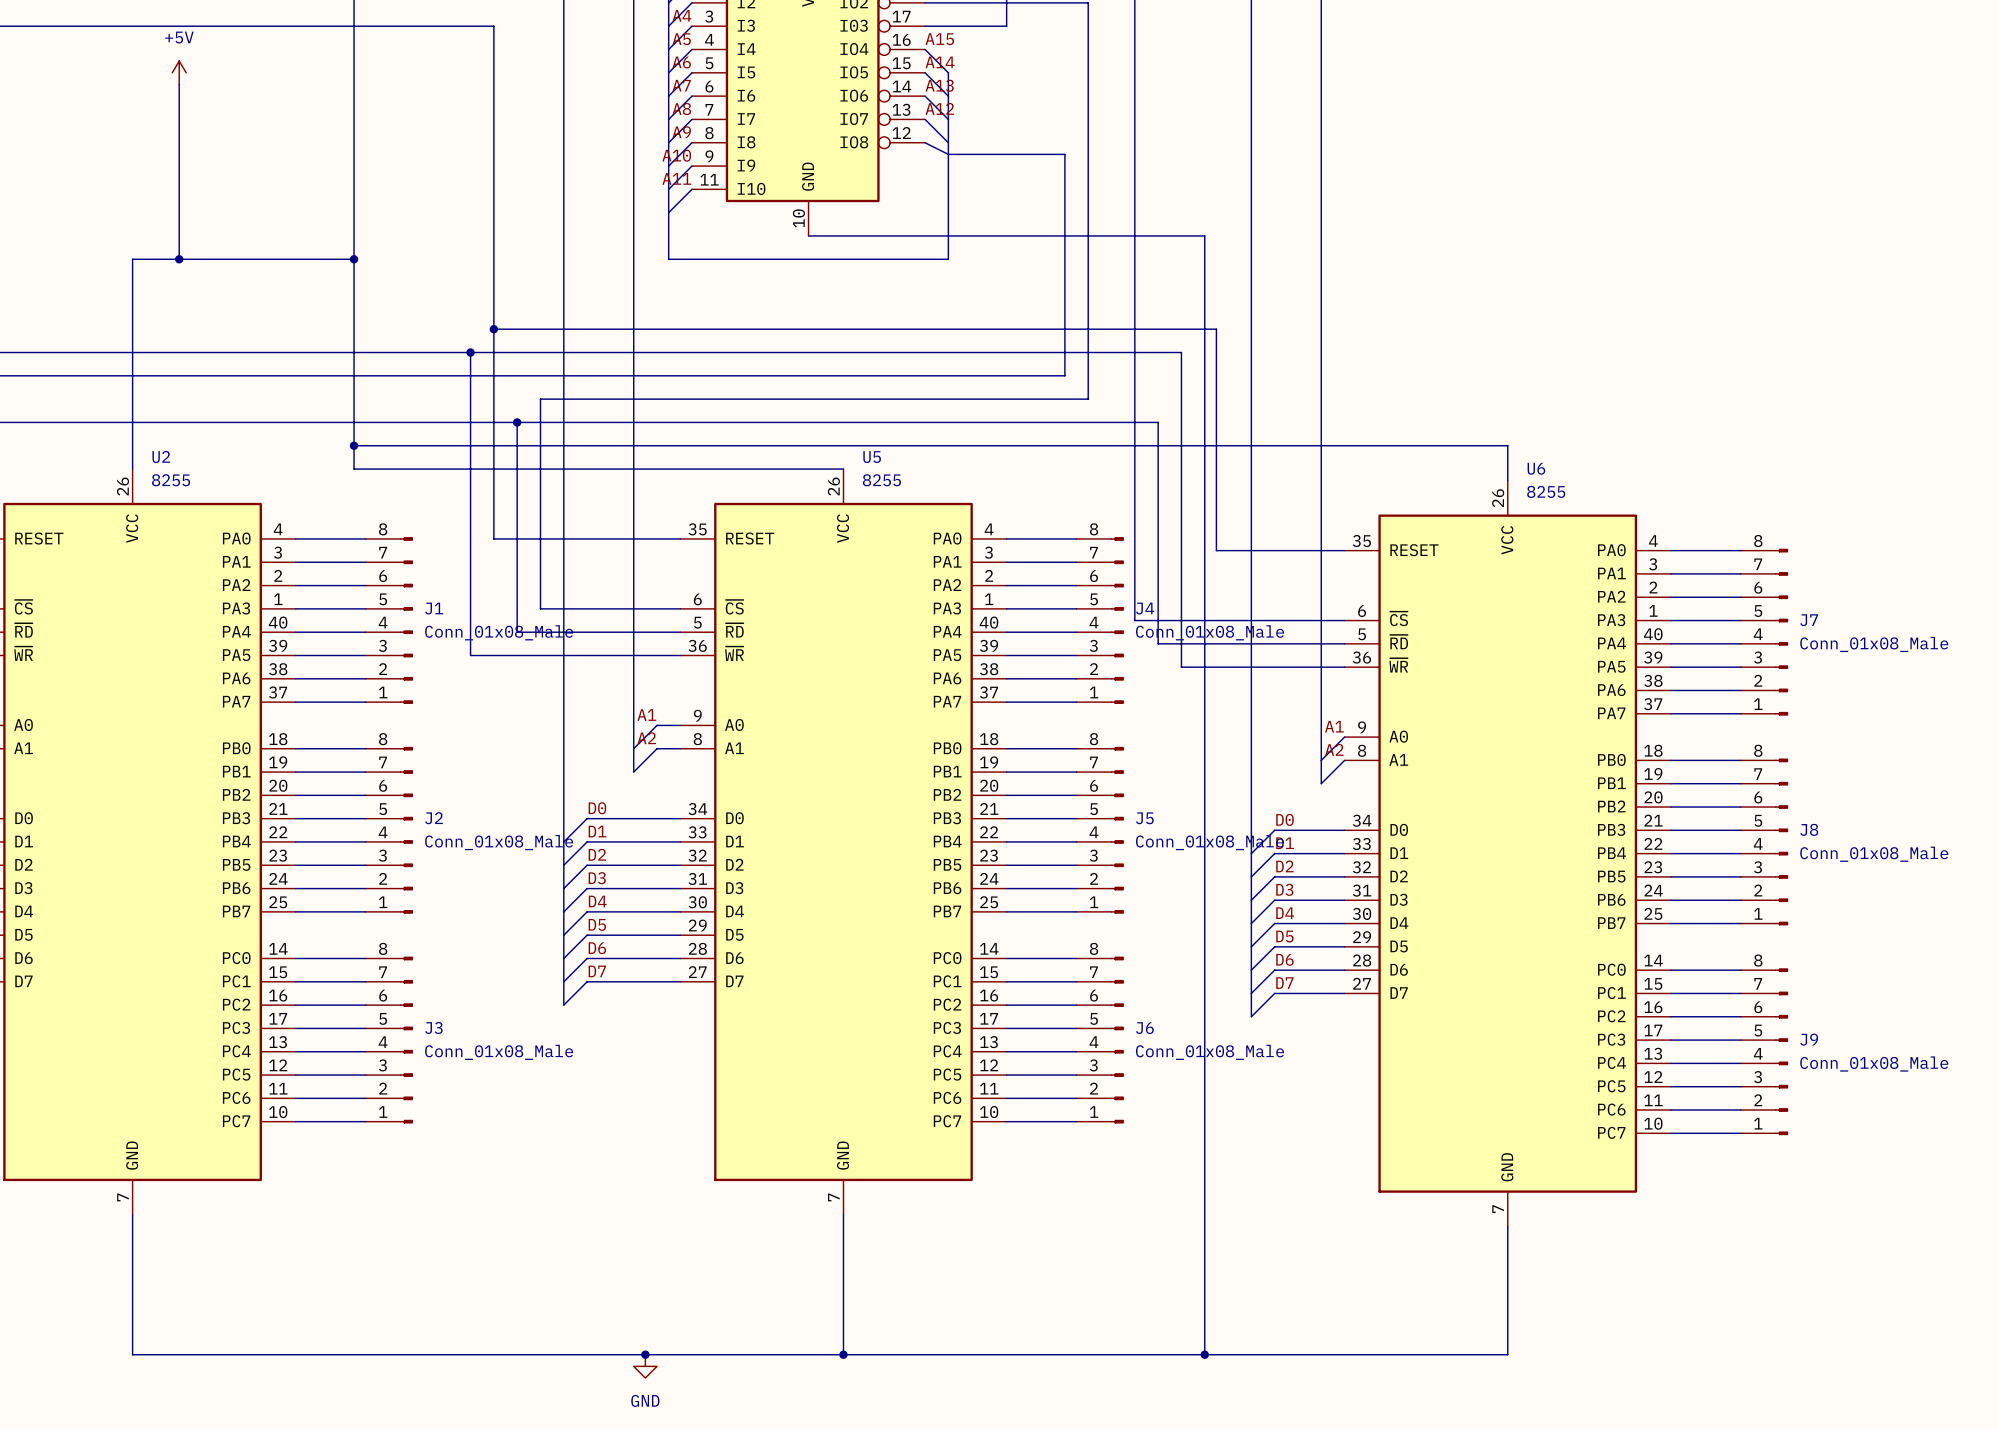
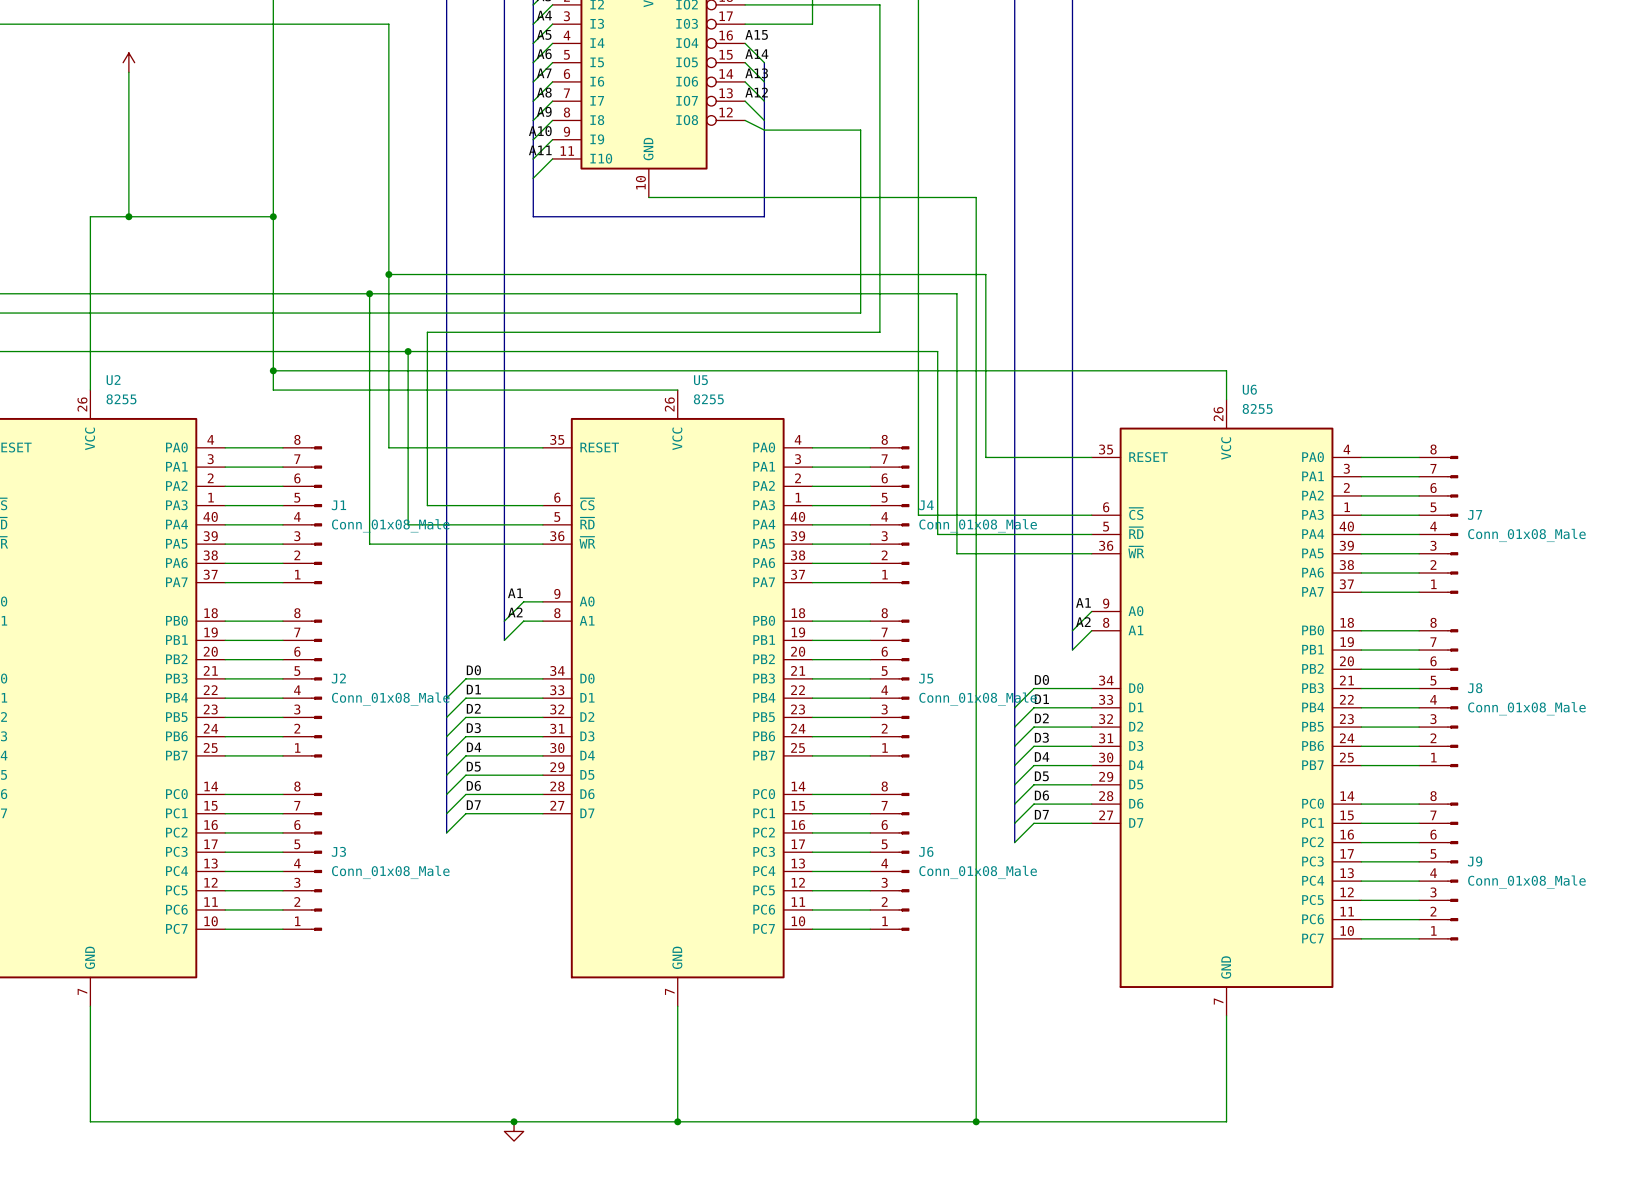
power symbol text: +5V (179, 37) -> none
power symbol text: GND (645, 1400) -> none

